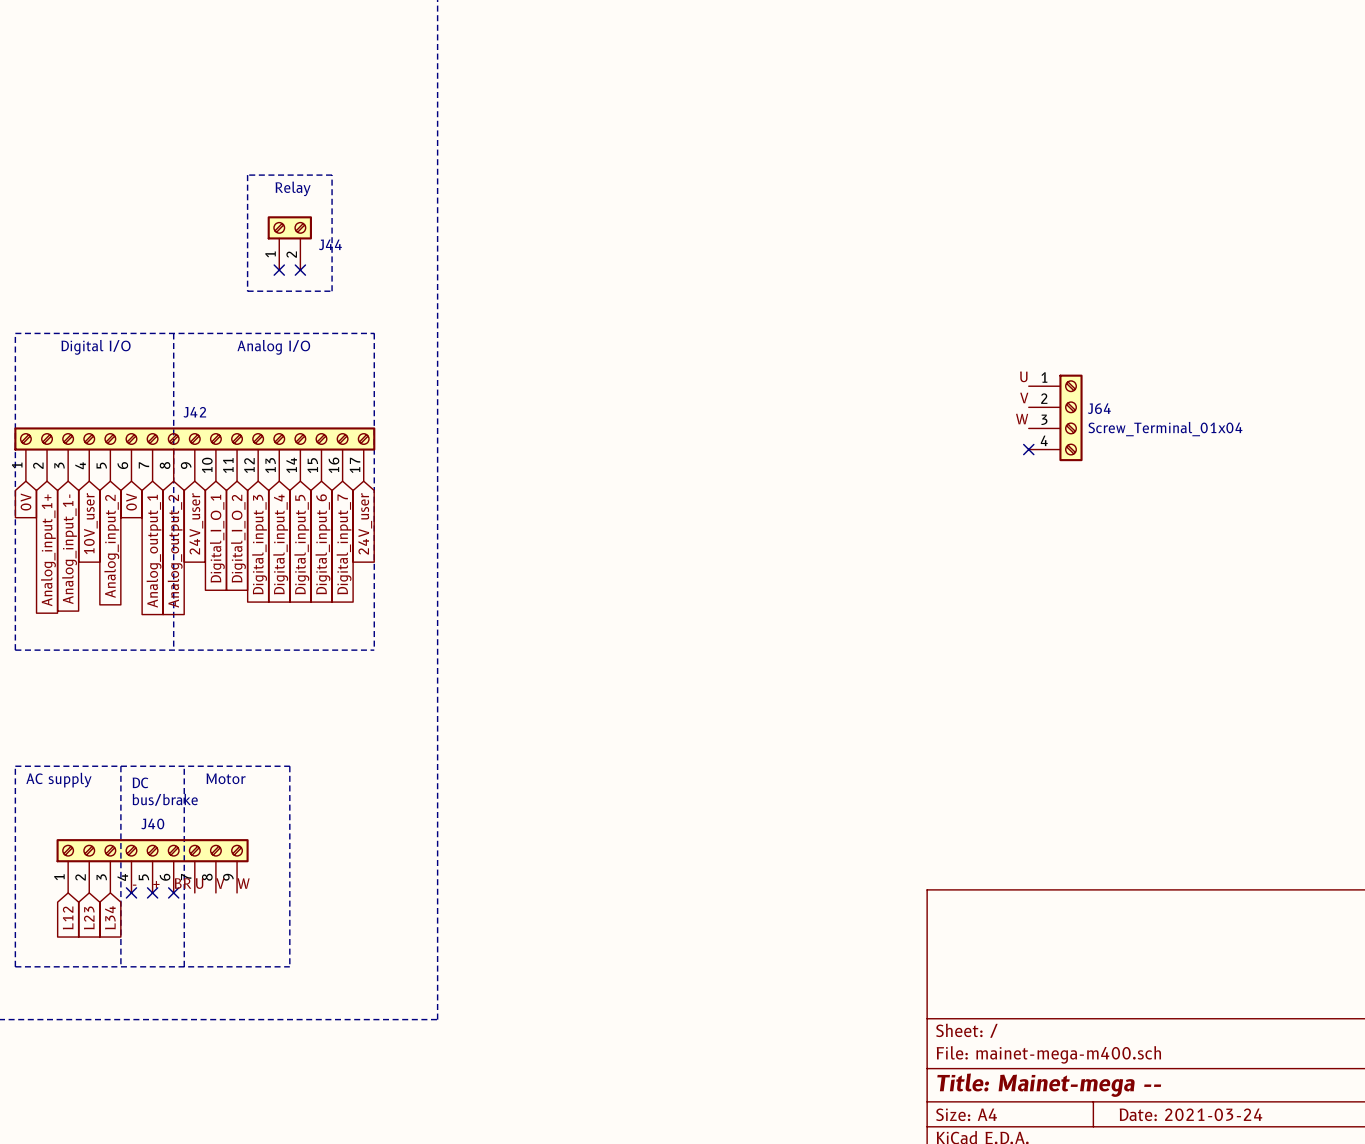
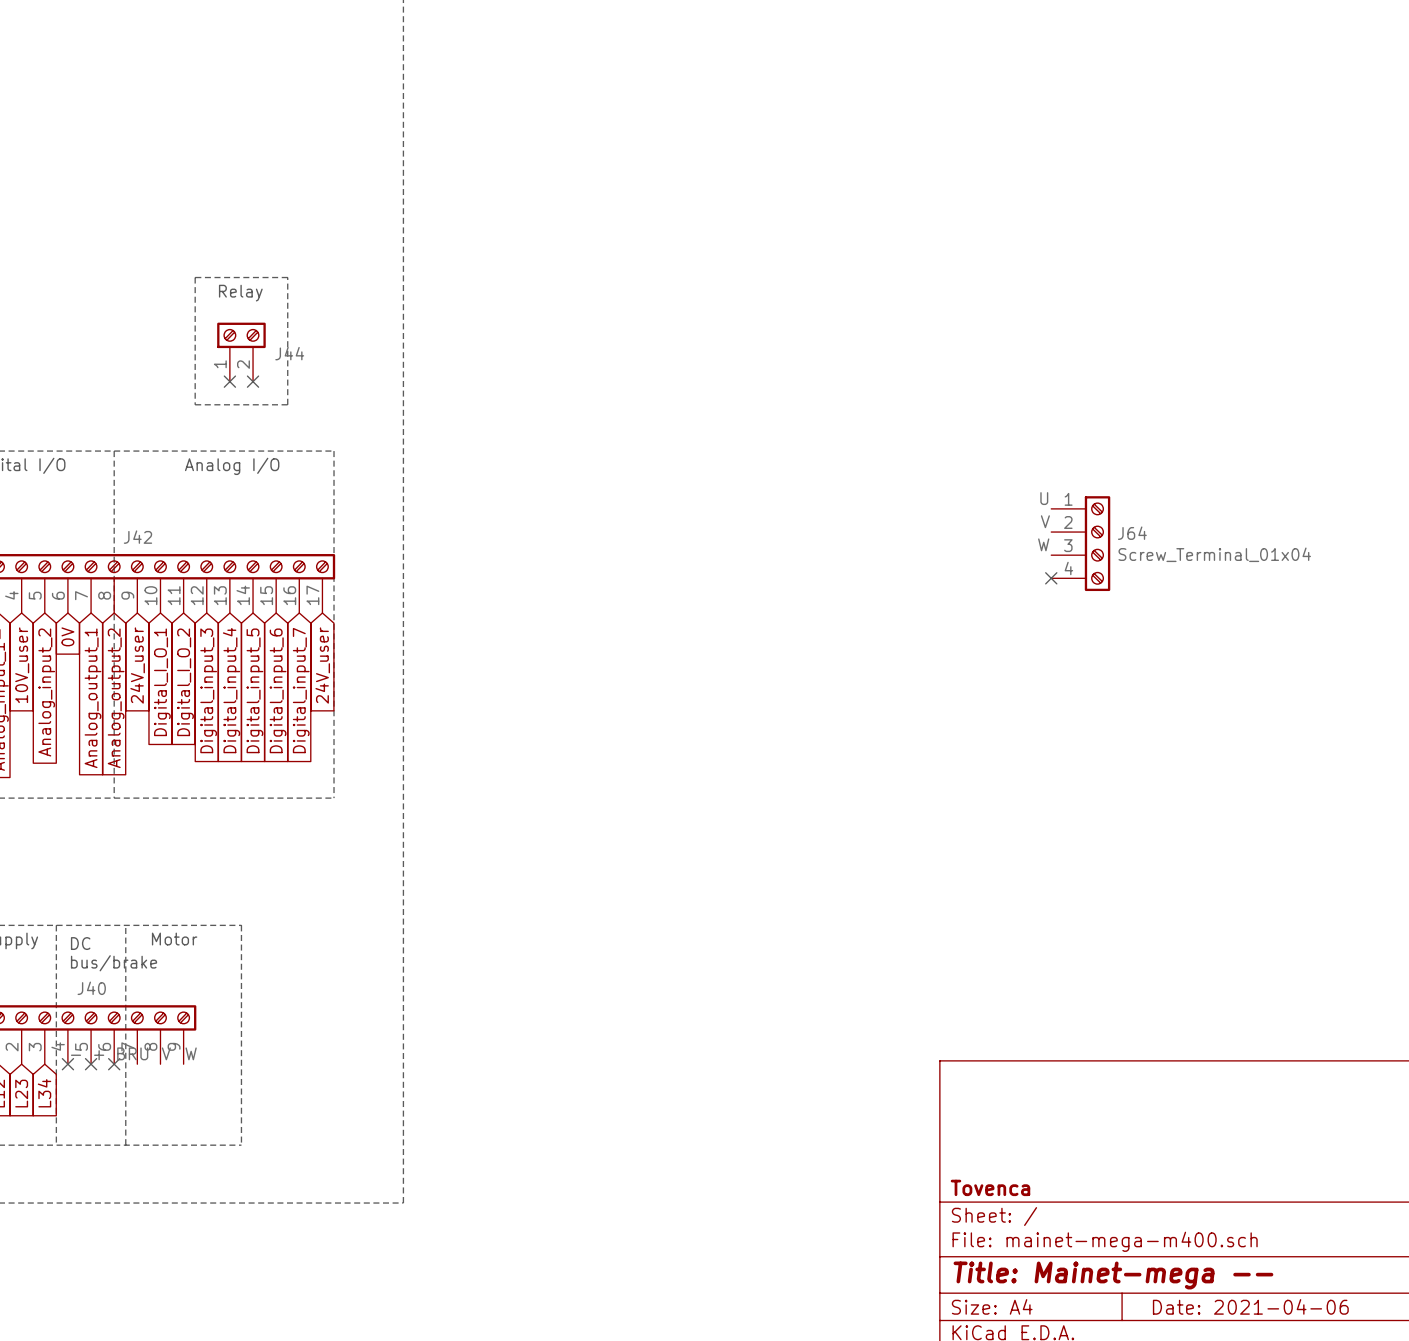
title block: none -> Tovenca (990, 1187)
title block: Date: 2021-03-24 (1190, 1114) -> Date: 2021-04-06 (1250, 1306)

